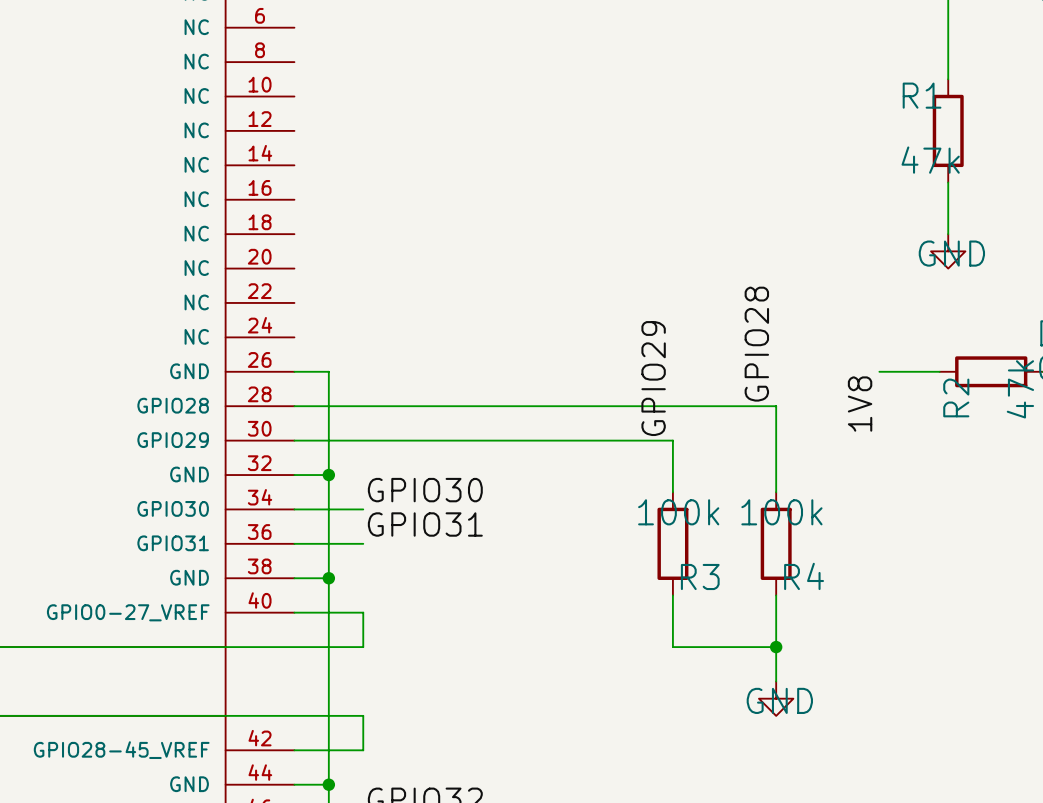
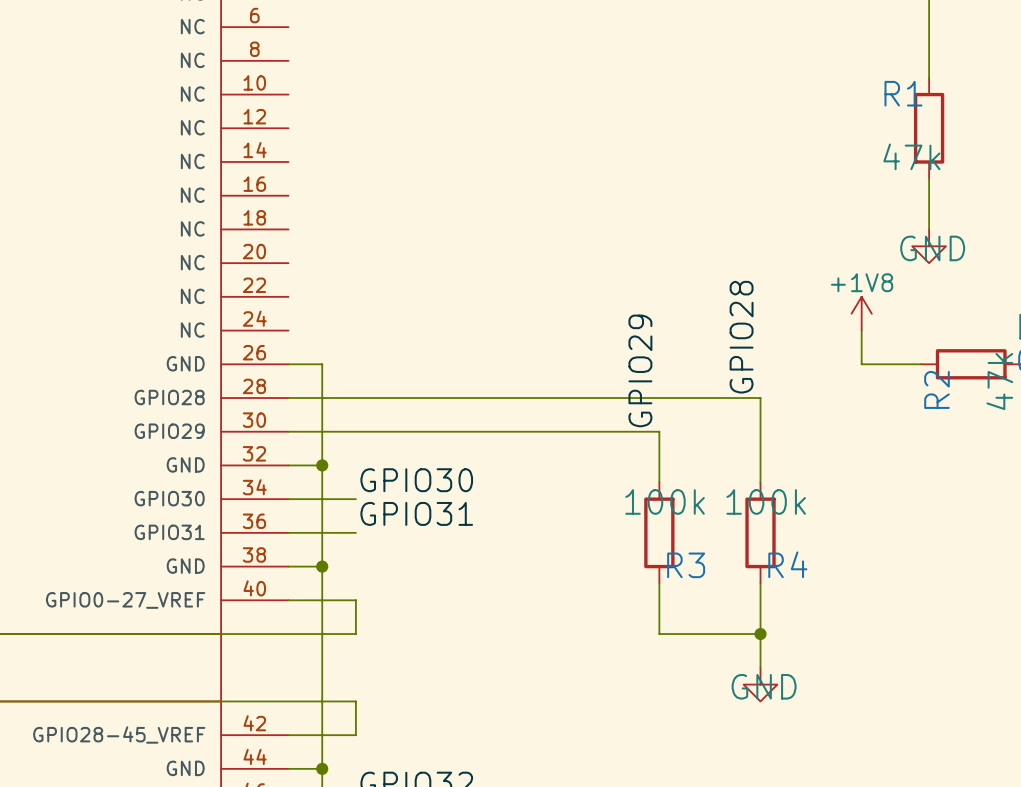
power symbol: none -> +1V8 (861, 313)
wire: none -> (861, 330) (861, 364)
label: 1V8 (860, 404) -> none

